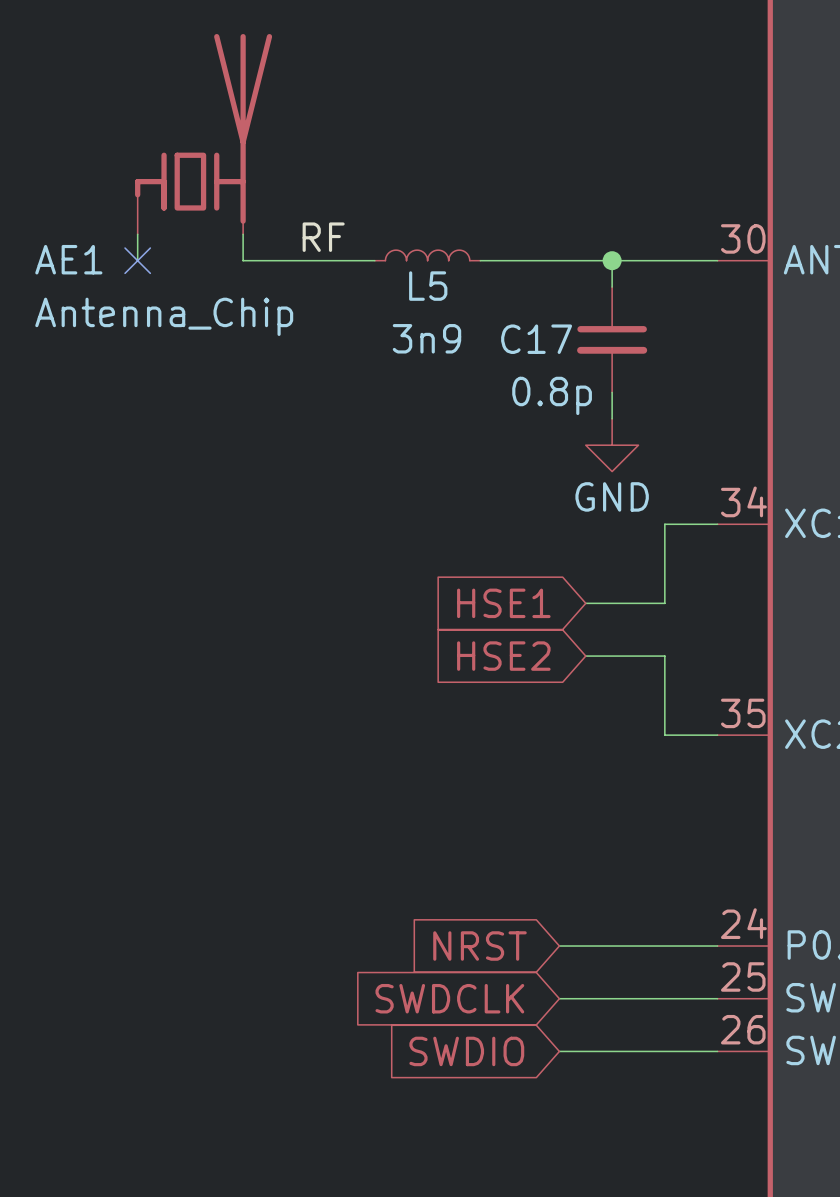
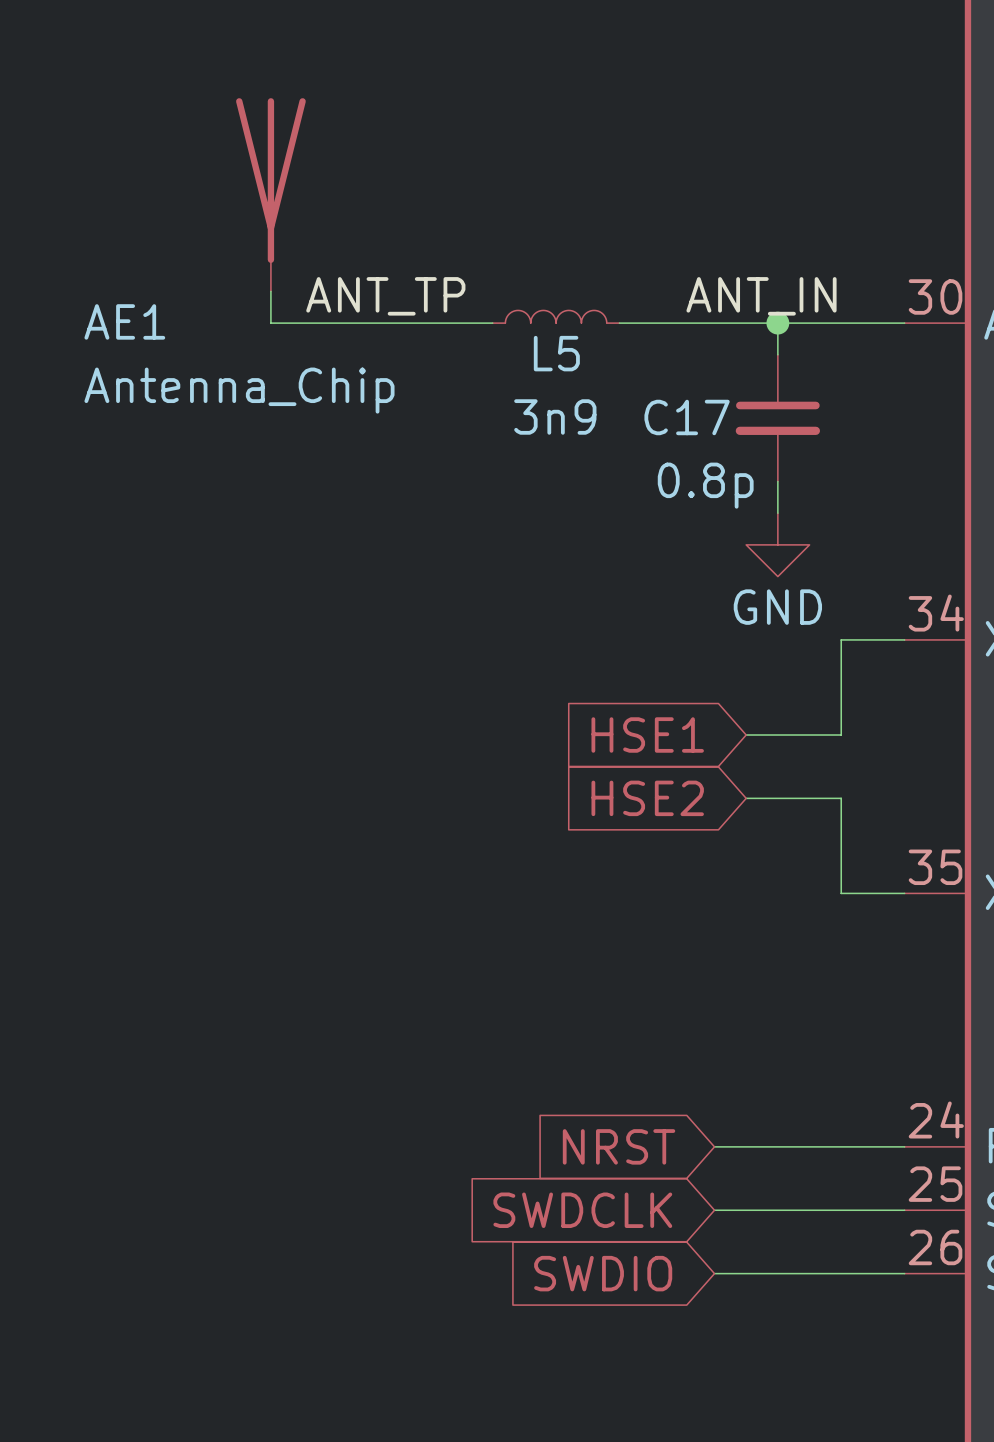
AE1 symbol: [135, 34, 273, 235] -> [236, 98, 306, 292]
wire: (137, 234) (137, 260) -> none
wire: (243, 234) (243, 260) -> (270, 291) (270, 323) (334, 323)
label: RF (323, 237) -> none
label: none -> ANT_TP (385, 296)
label: none -> ANT_IN (761, 296)
no-connect mark: (137, 260) -> none

